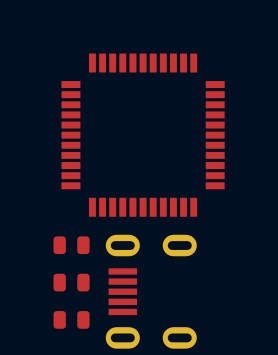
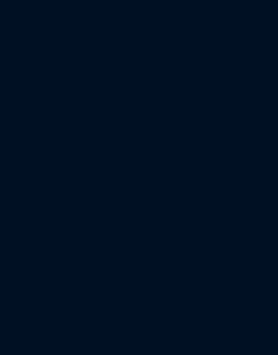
part: (143, 135) -> none
part: (71, 245) -> none
part: (71, 282) -> none
part: (151, 291) -> none
part: (71, 319) -> none

